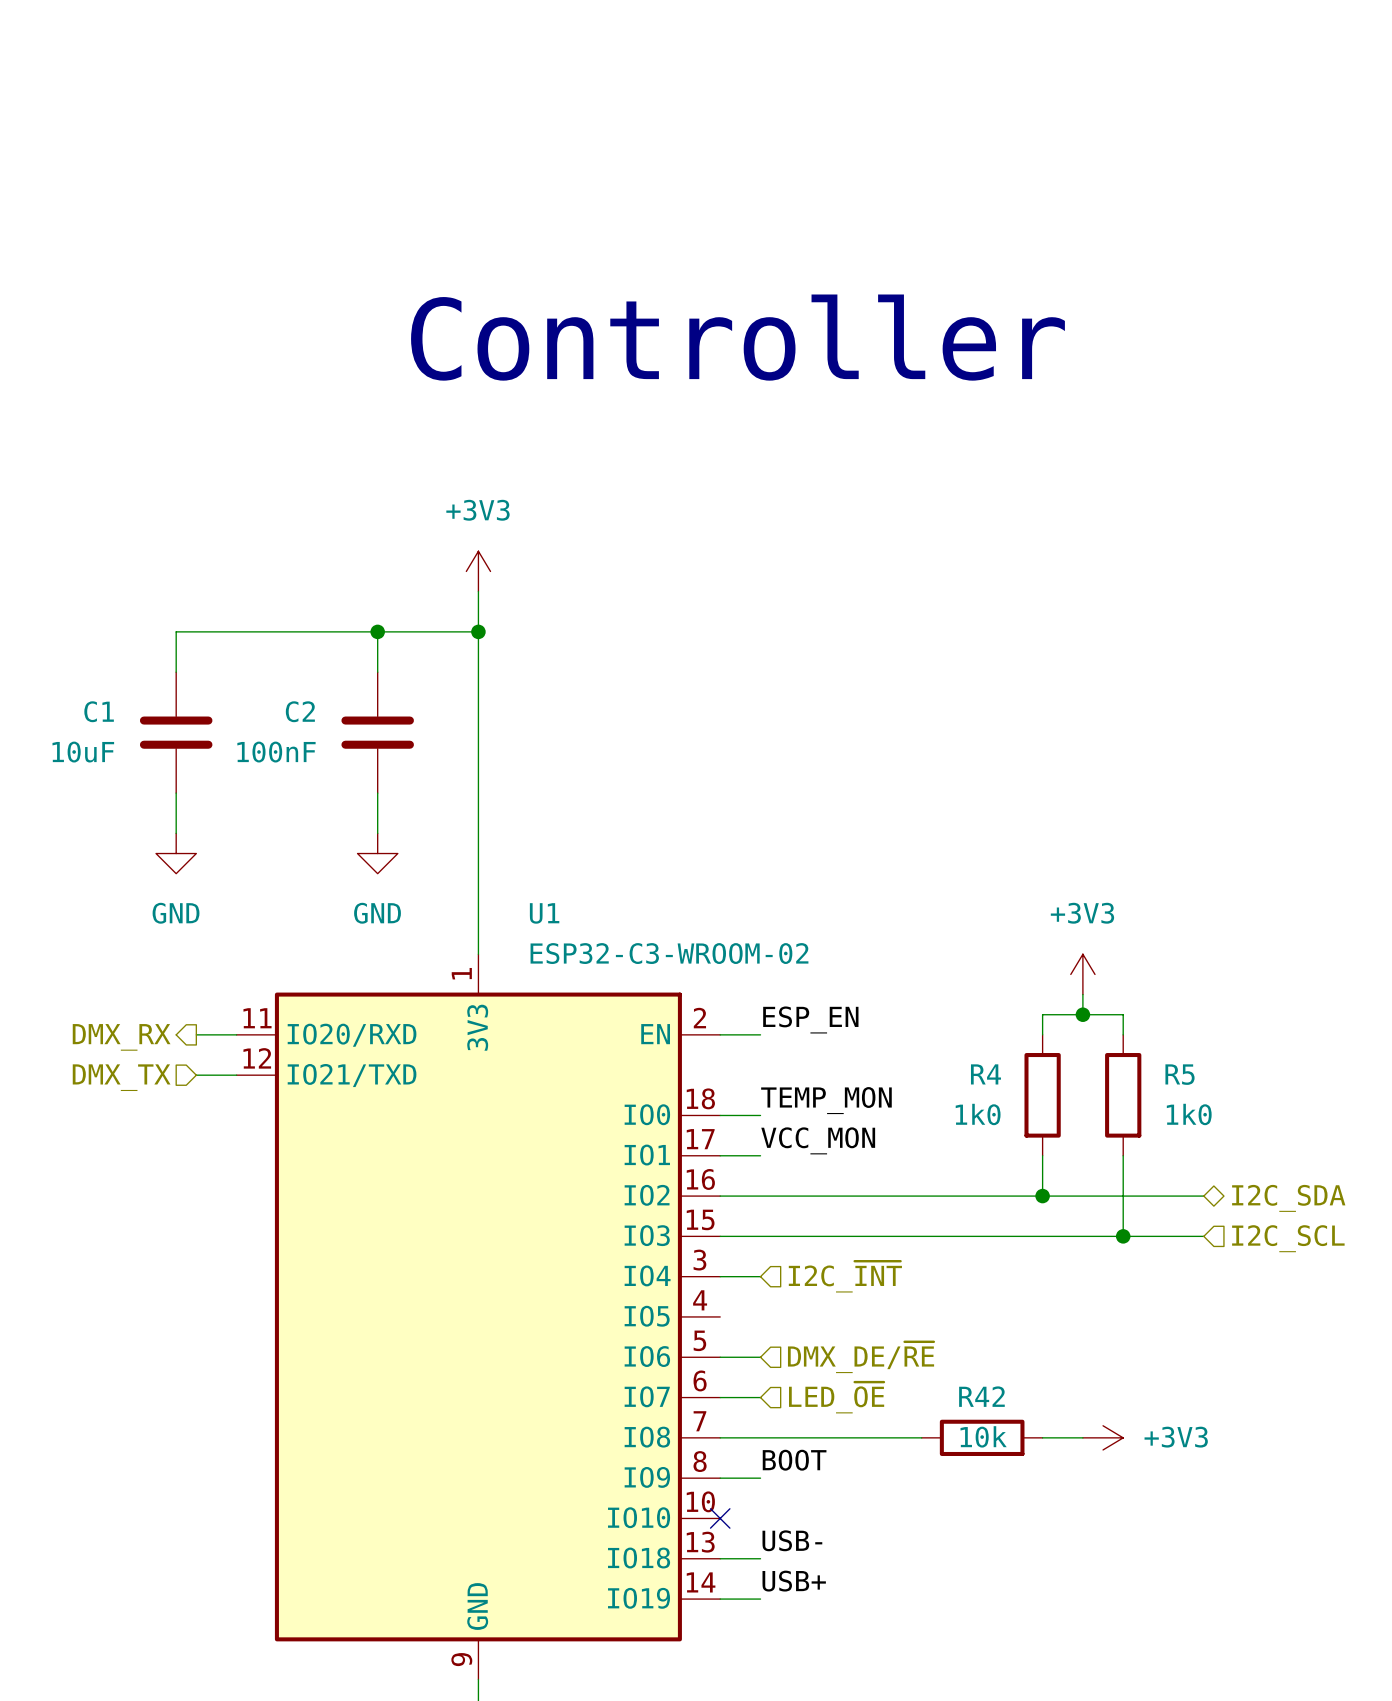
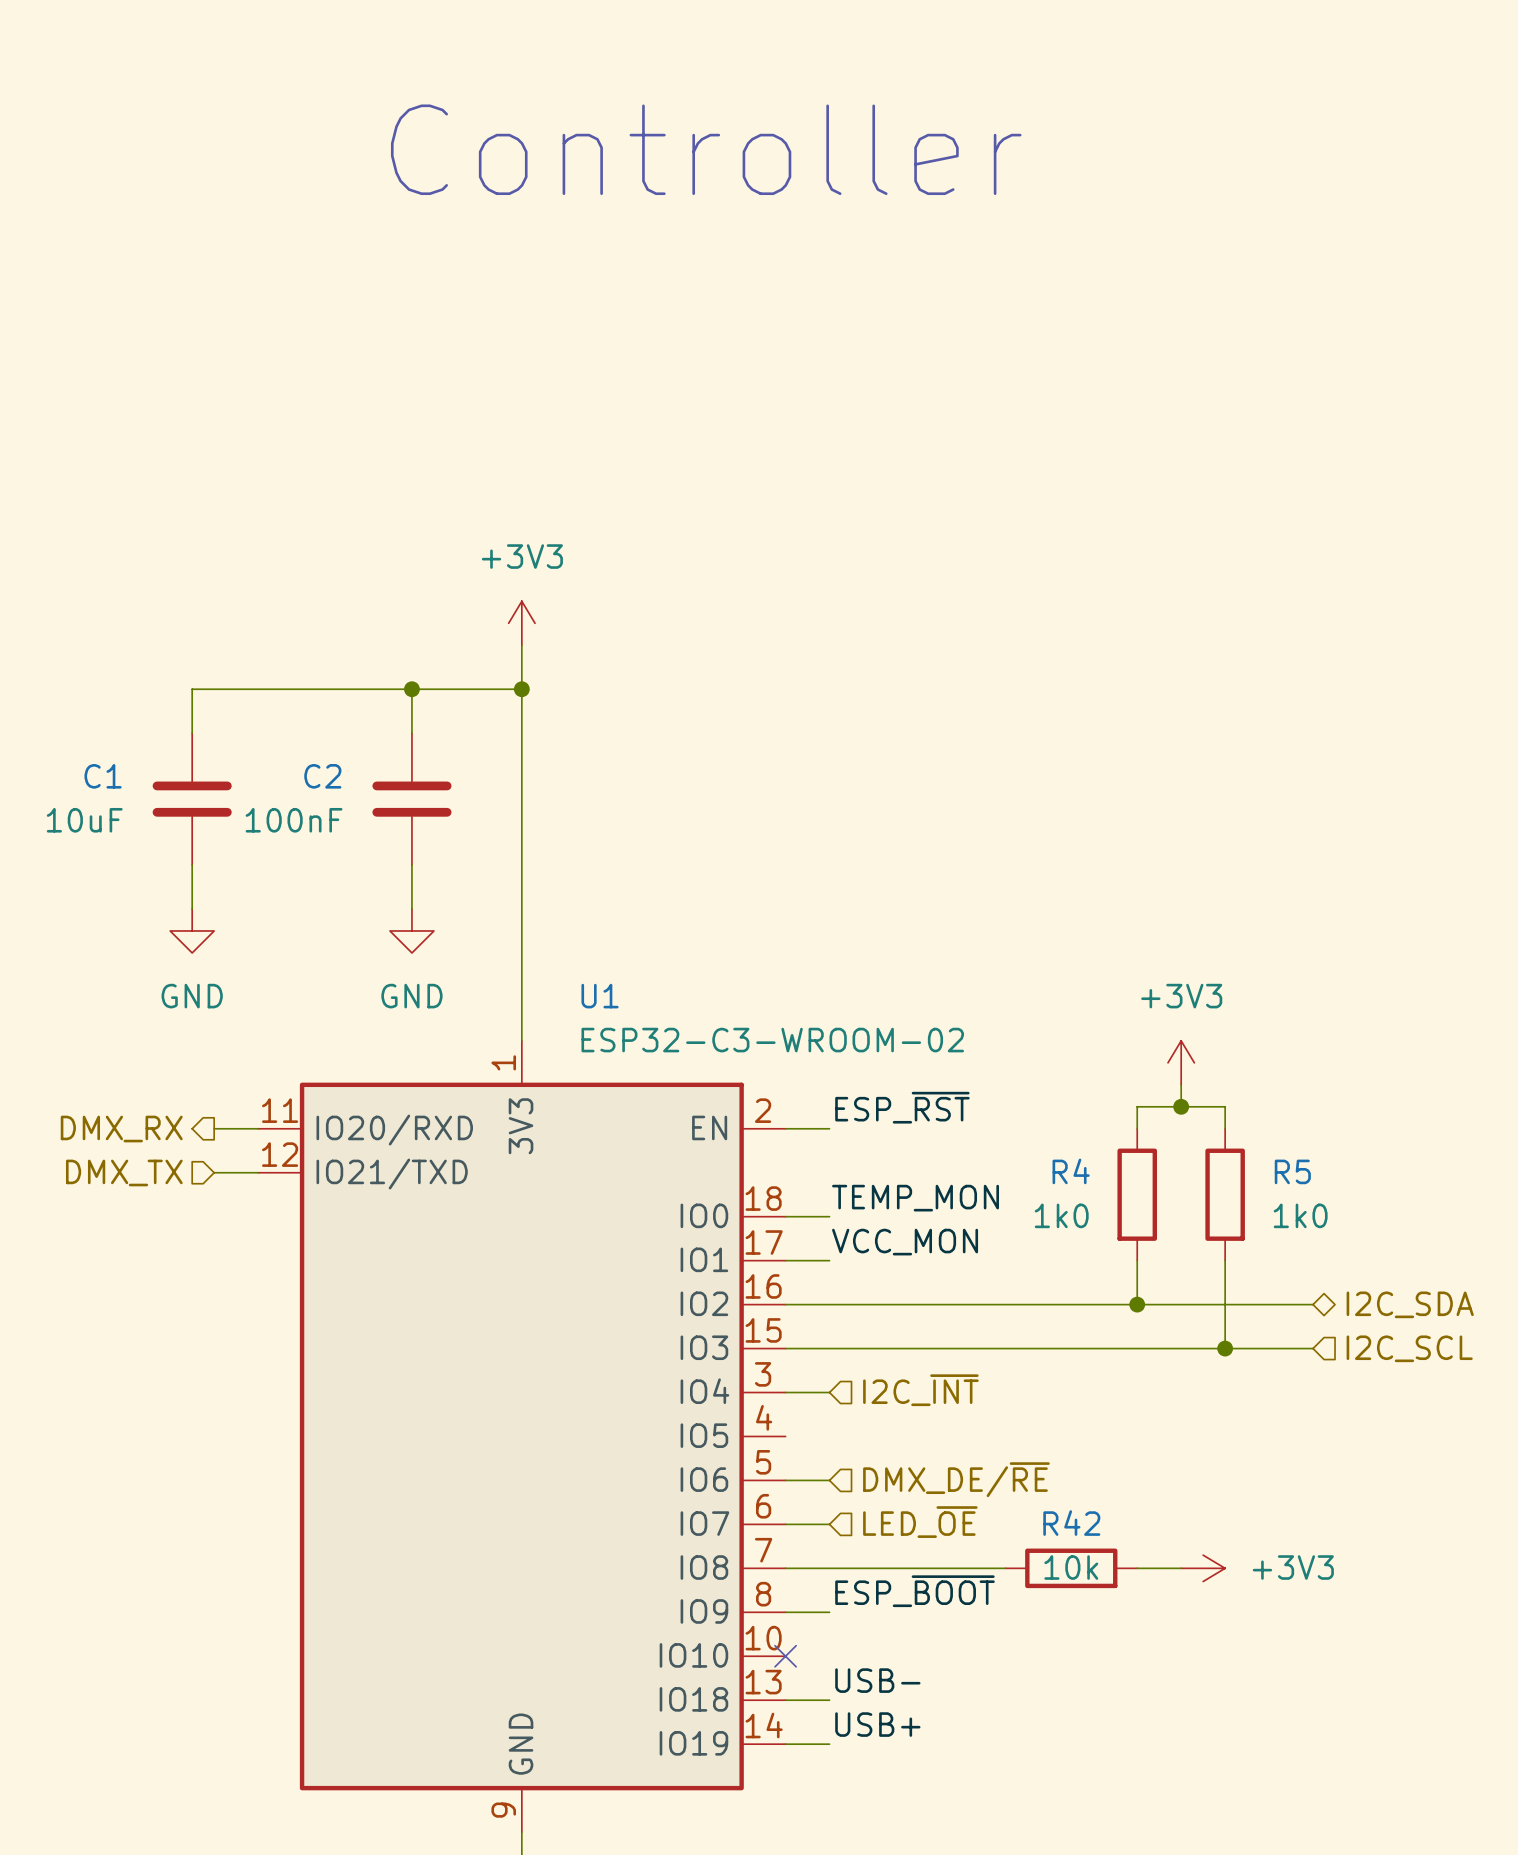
text position: Controller (737, 337) -> Controller (706, 149)
label: ESP_EN (810, 1019) -> ESP_~{RST} (902, 1107)
label: BOOT (794, 1460) -> ESP_~{BOOT} (914, 1591)

